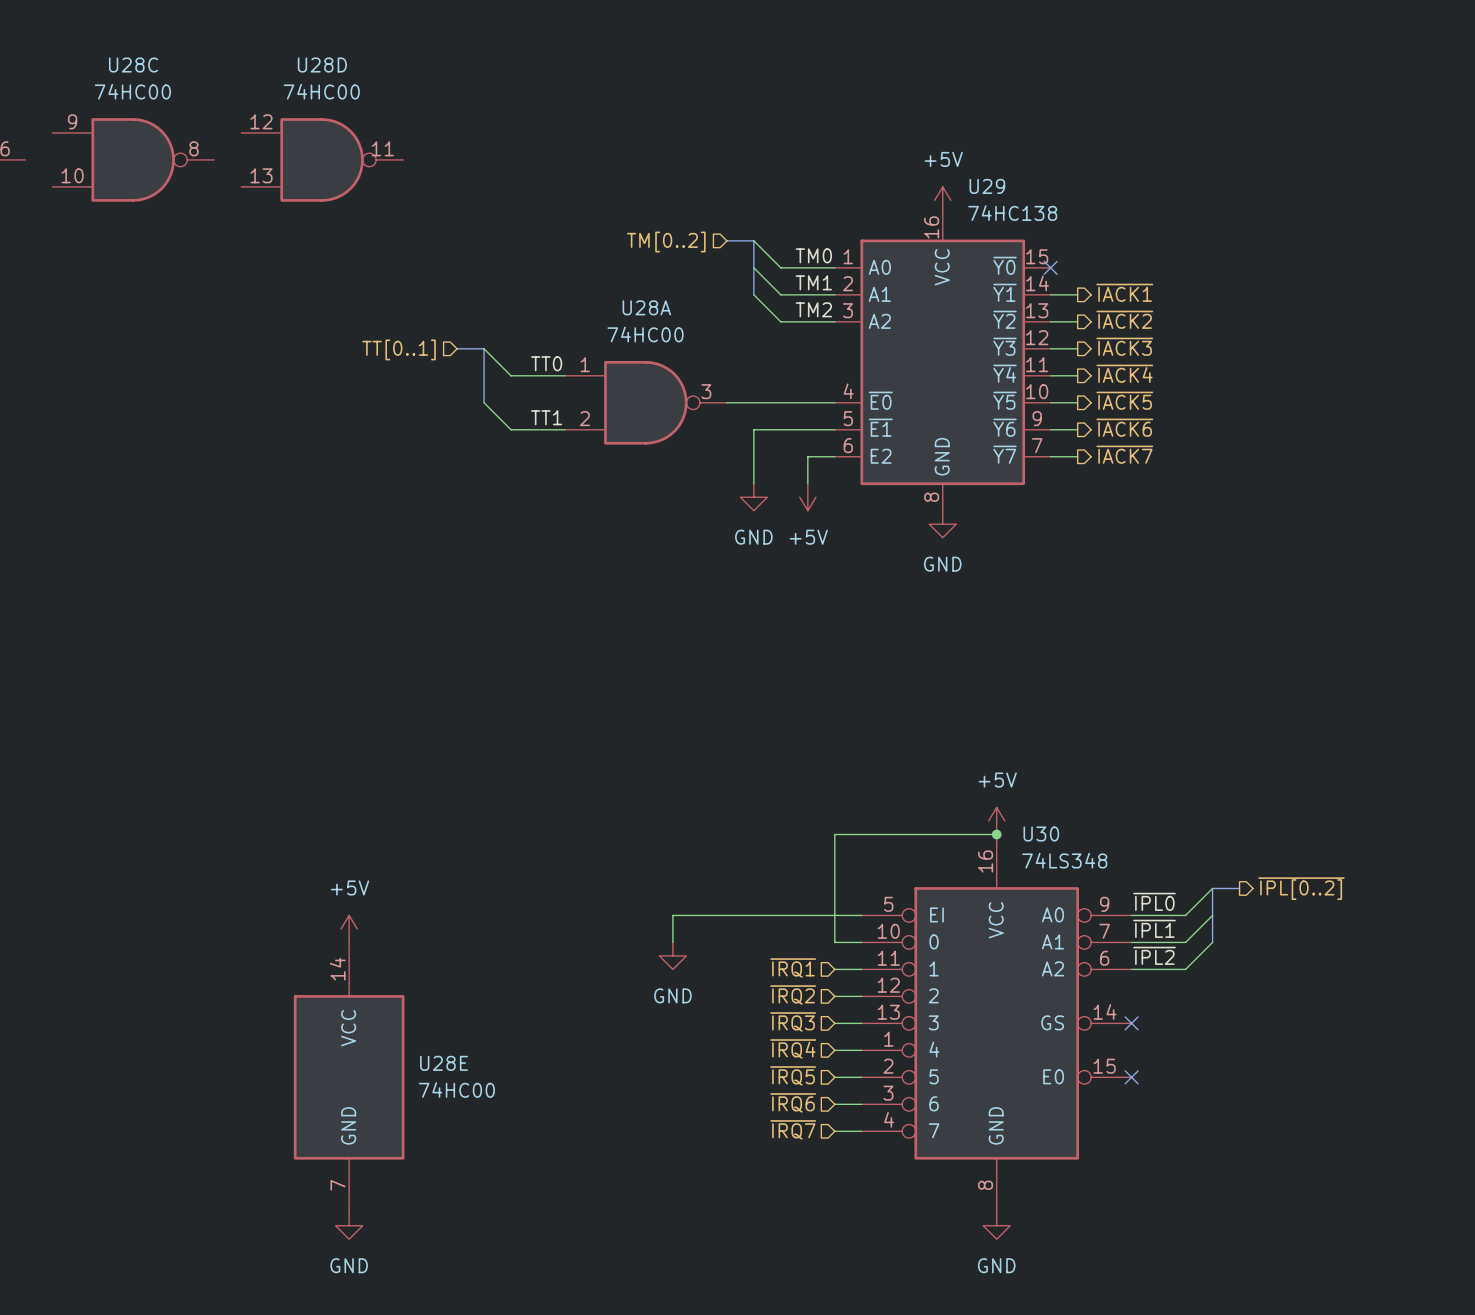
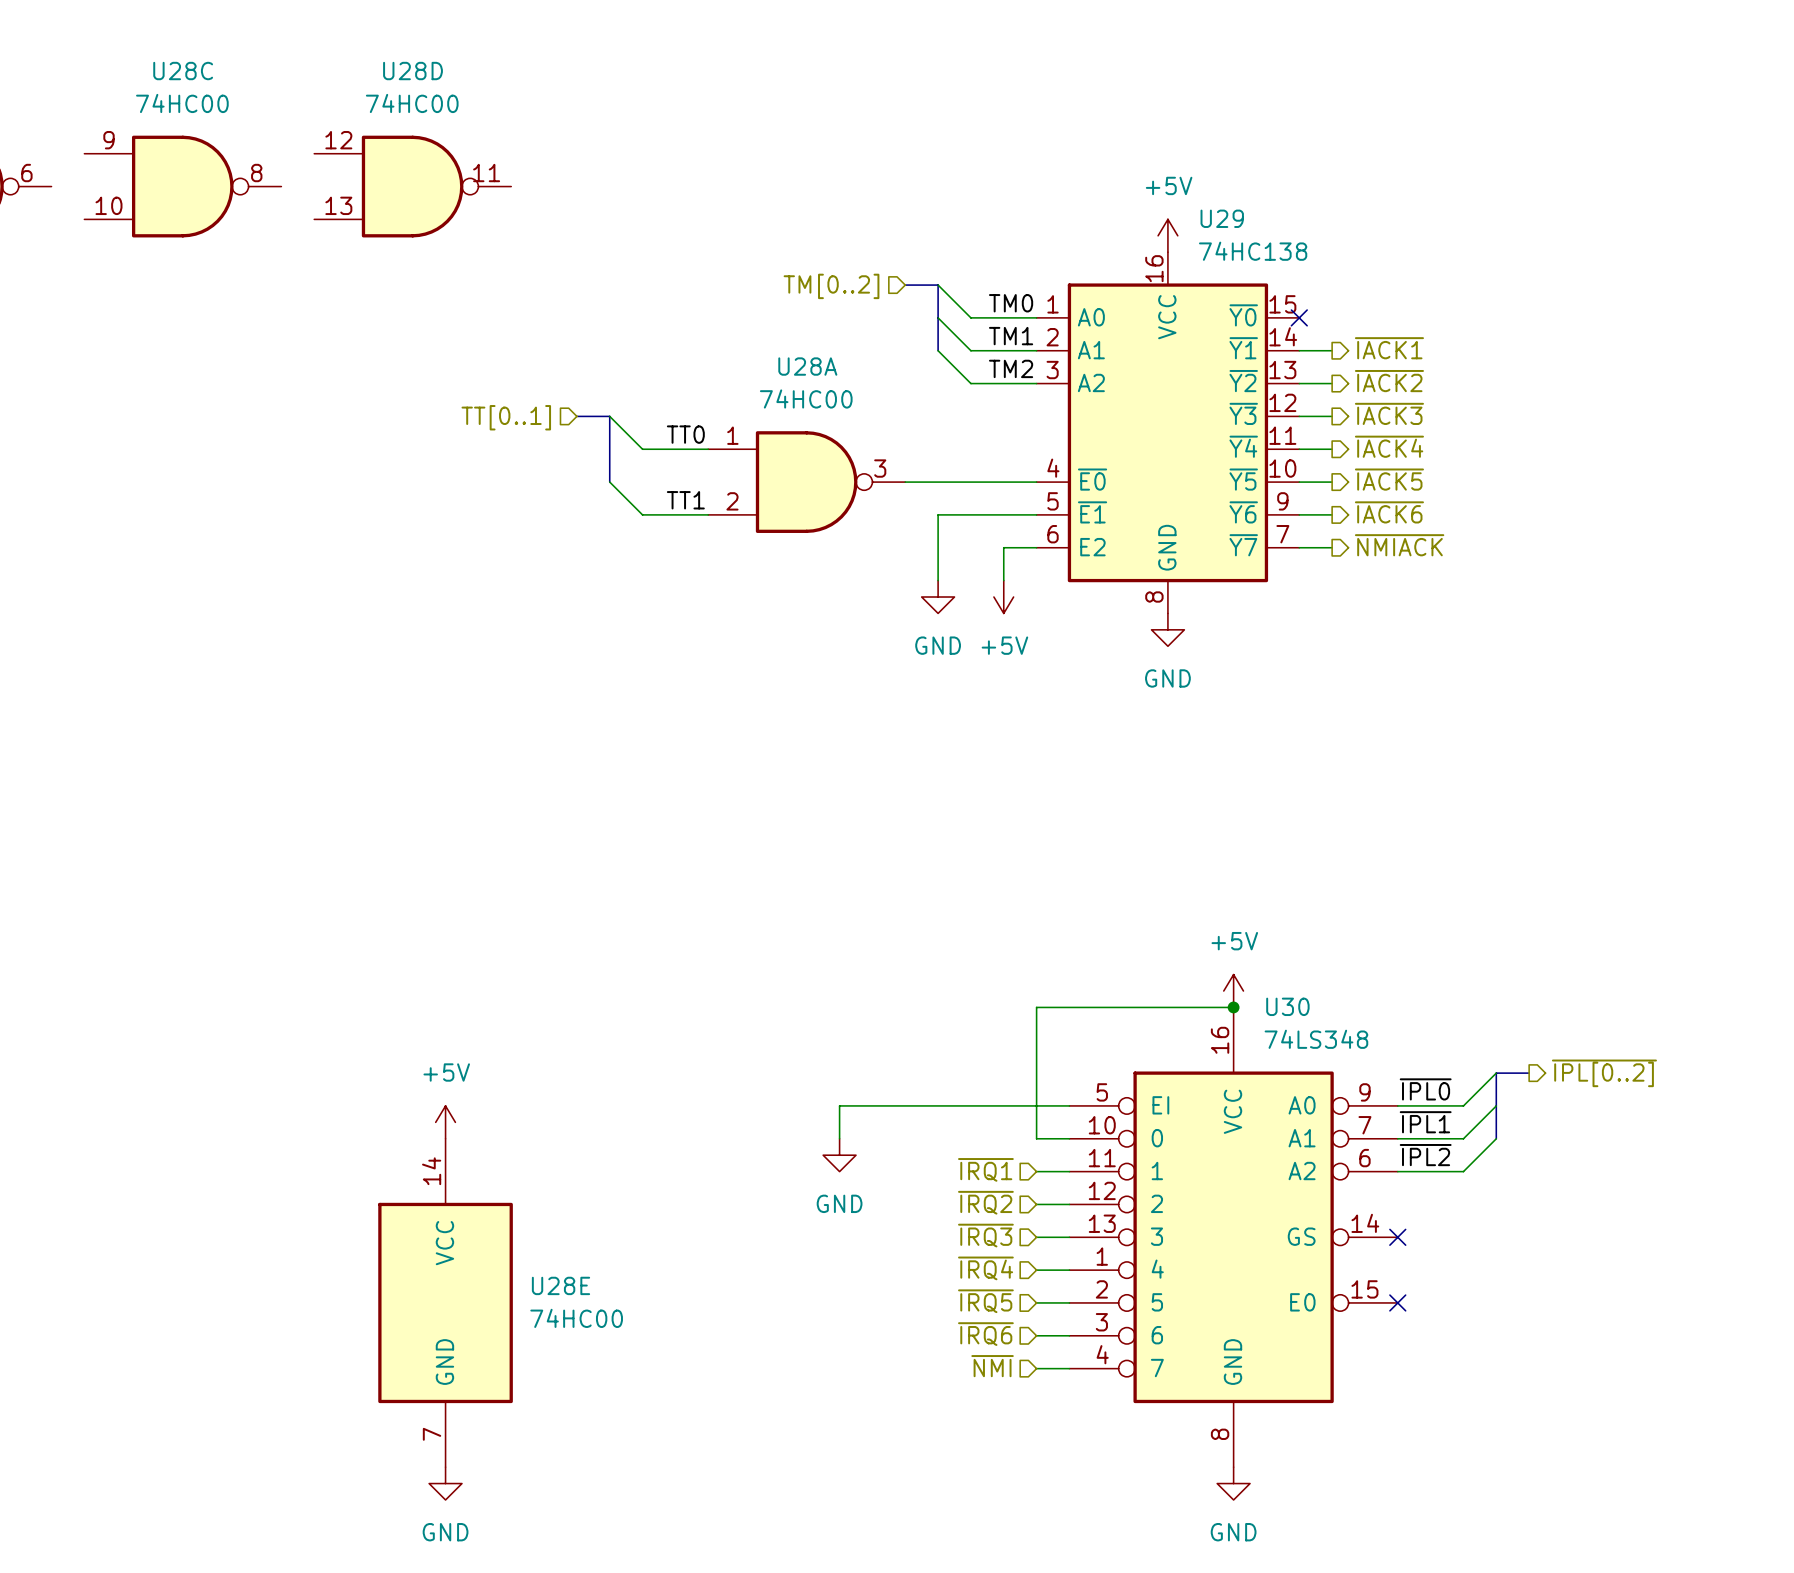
hierarchical label: ~{IACK7} (1124, 454) -> ~{NMIACK} (1399, 545)
hierarchical label: ~{IRQ7} (793, 1129) -> ~{NMI} (992, 1366)

